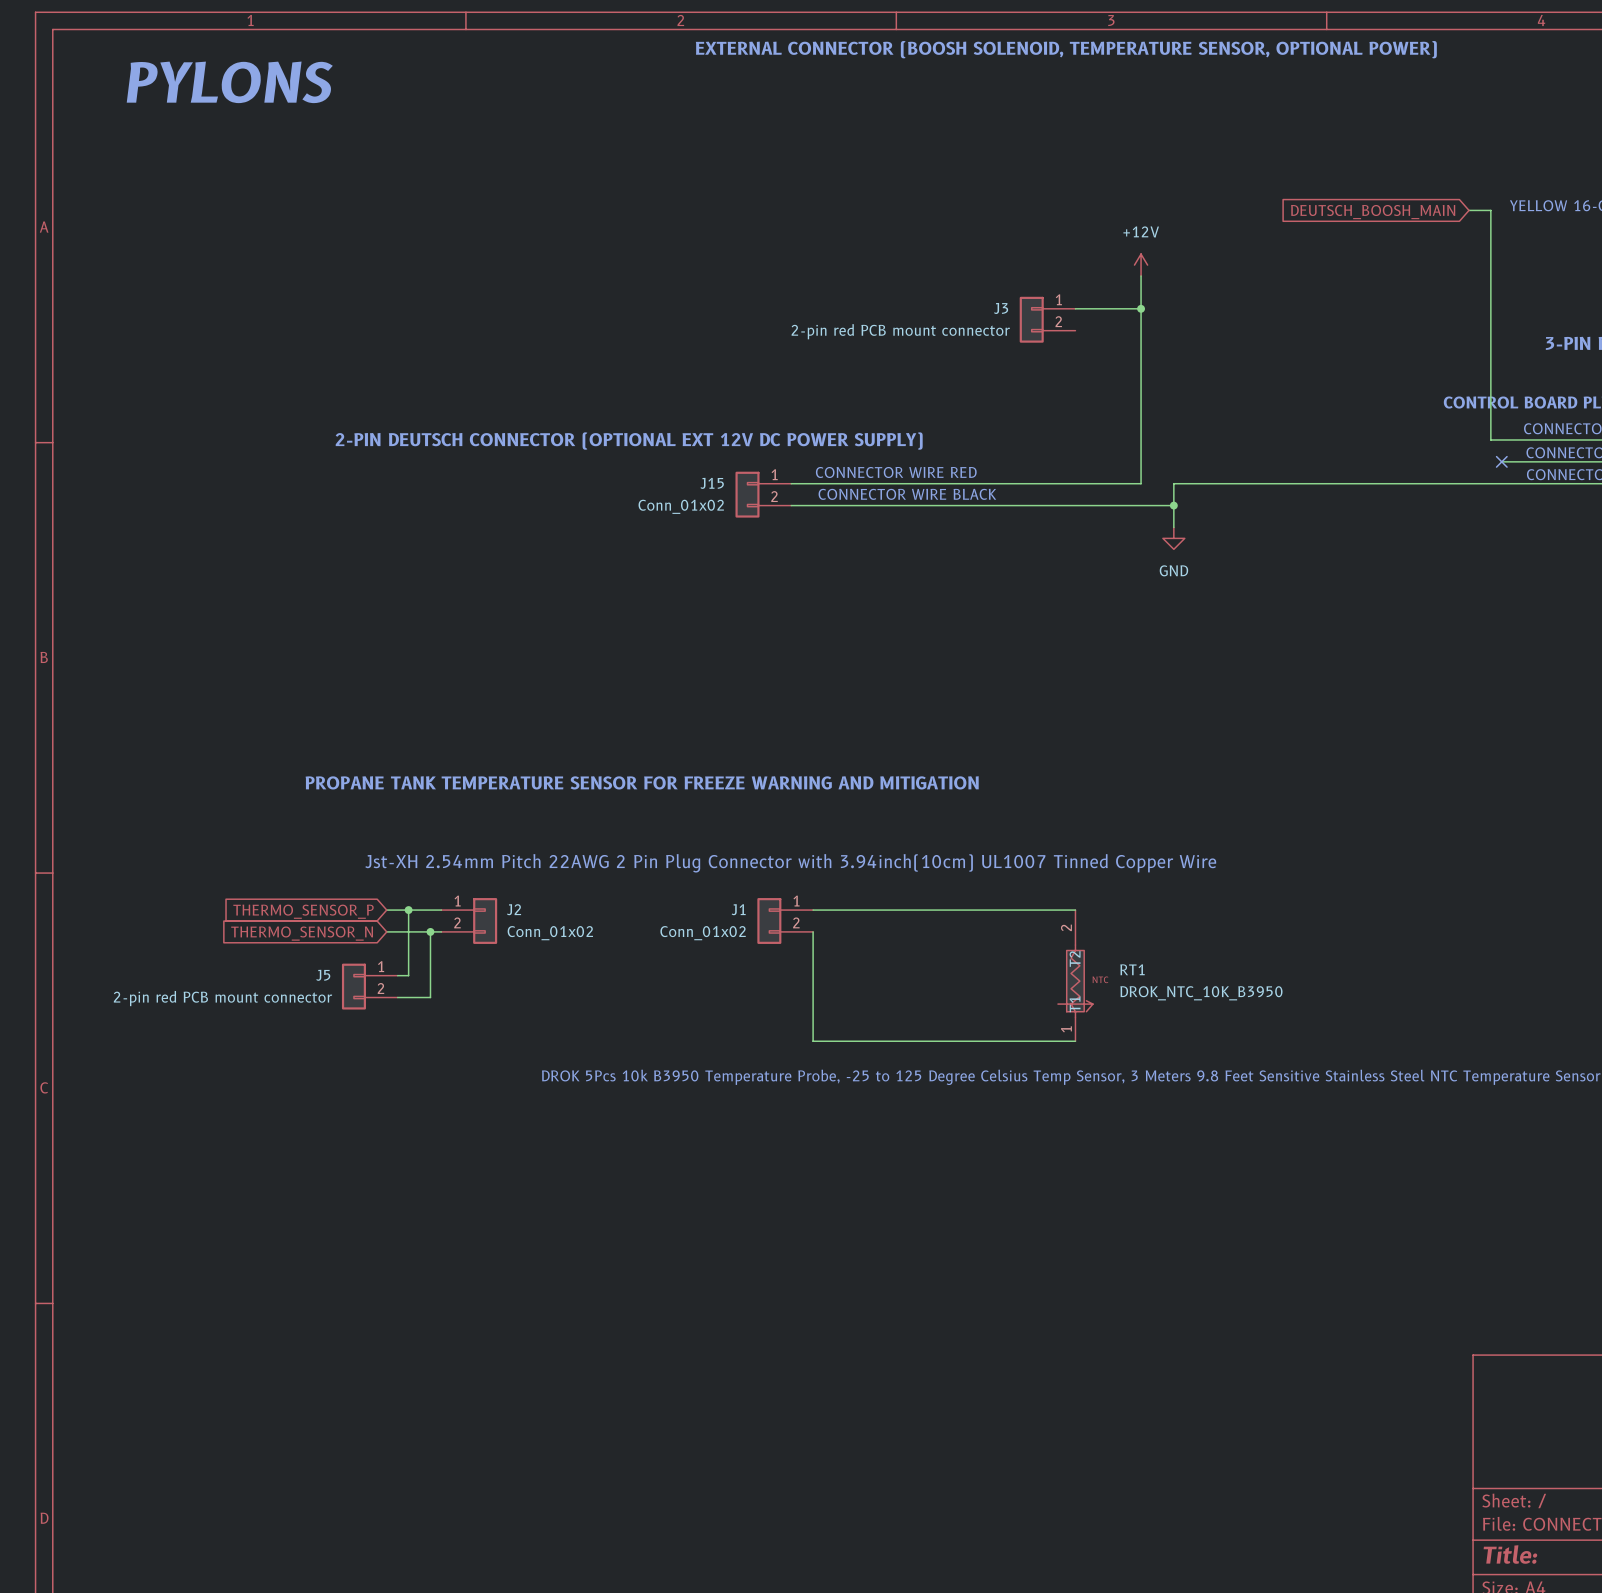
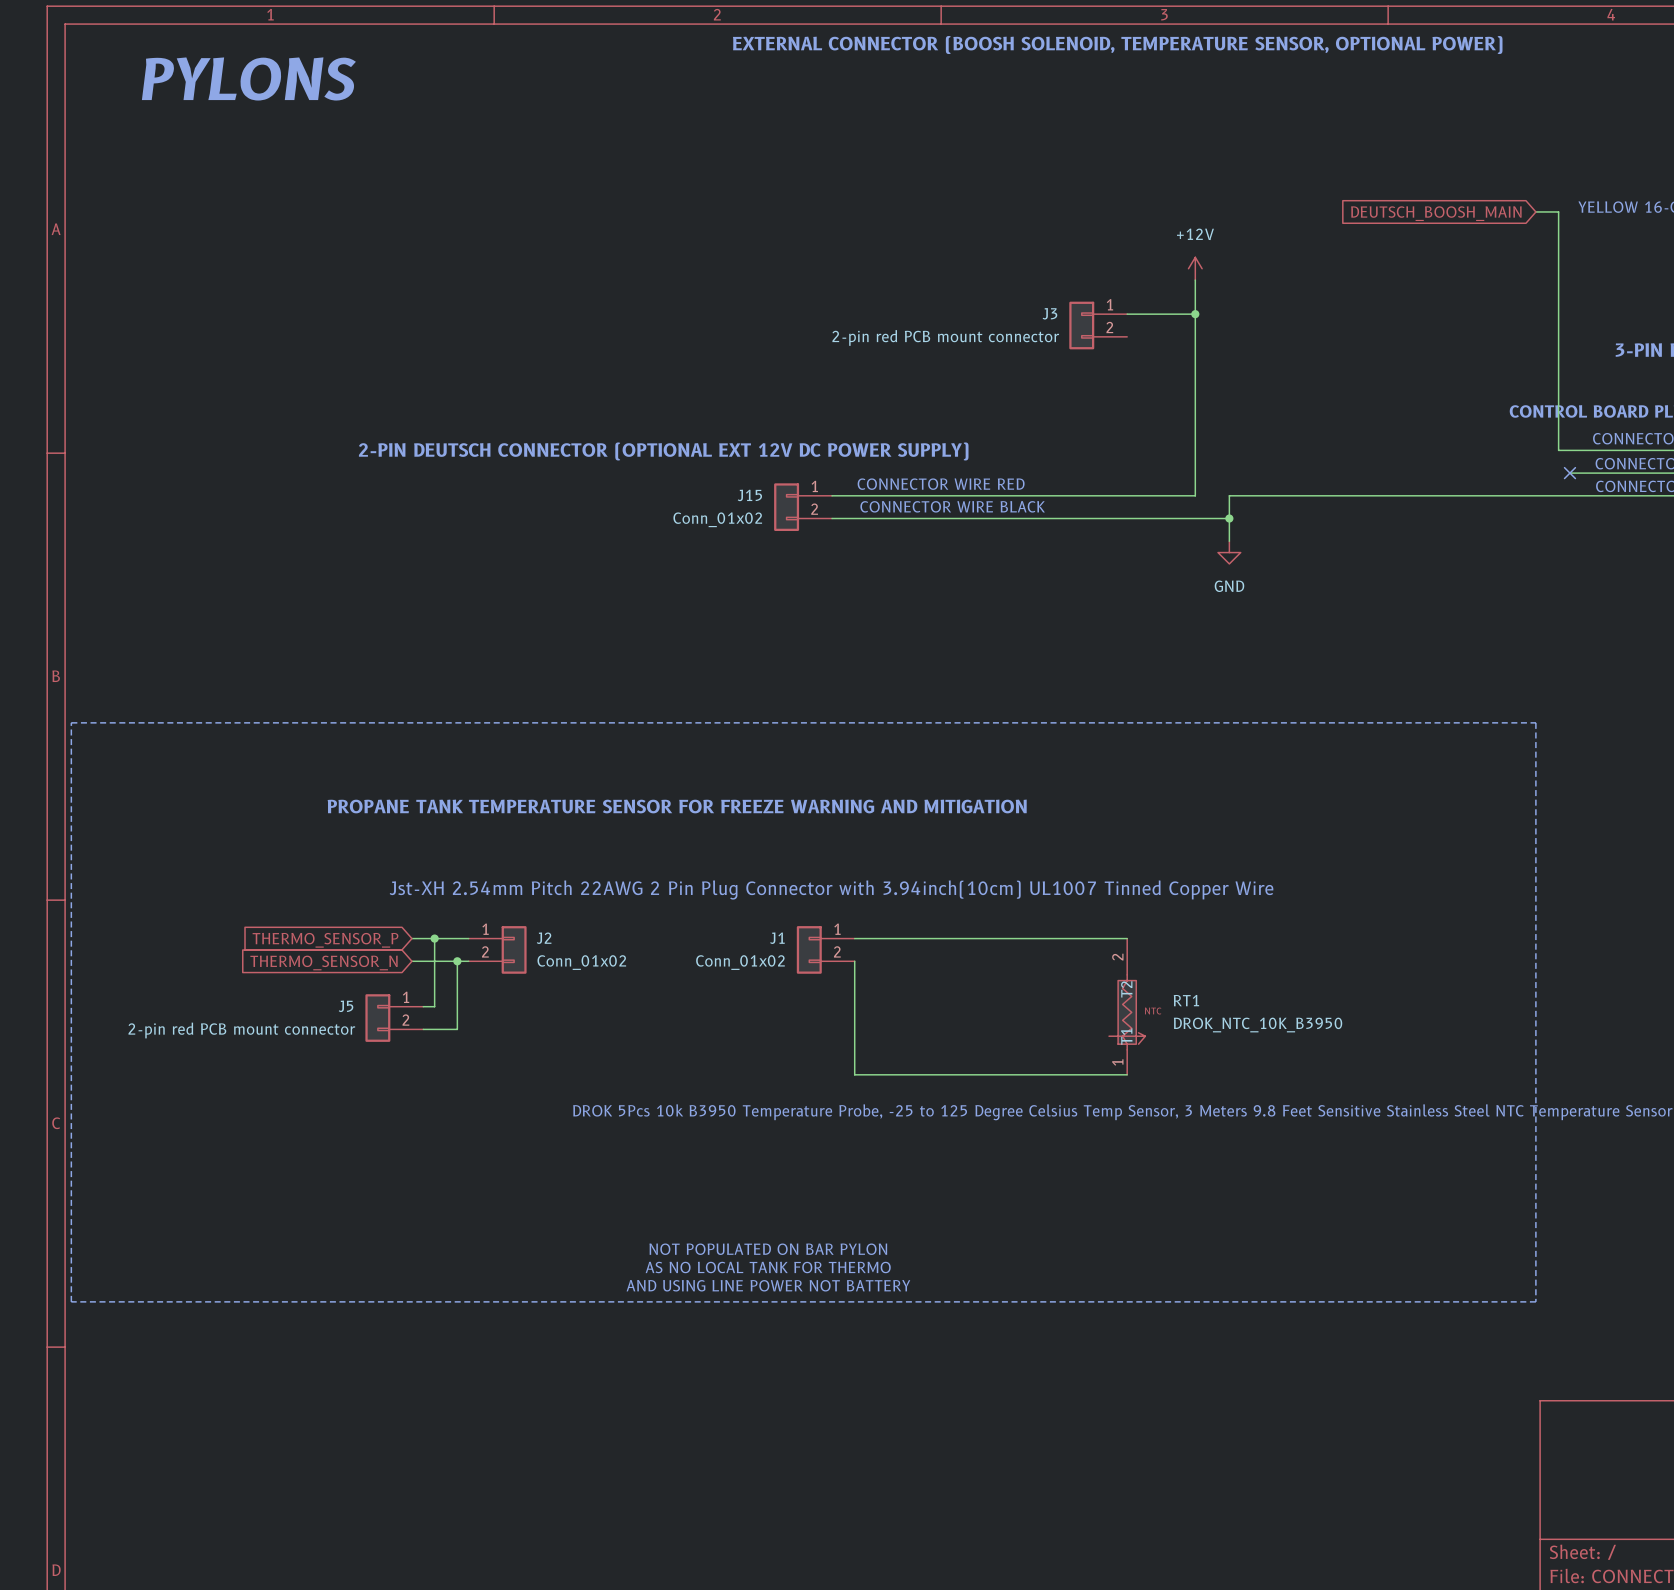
line: none -> (71, 722) (1535, 722) (1535, 1301) (71, 1301) (71, 722)
text: none -> NOT POPULATED ON BAR PYLON (768, 1249)
text: none -> AS NO LOCAL TANK FOR THERMO (768, 1267)
text: none -> AND USING LINE POWER NOT BATTERY (768, 1285)

